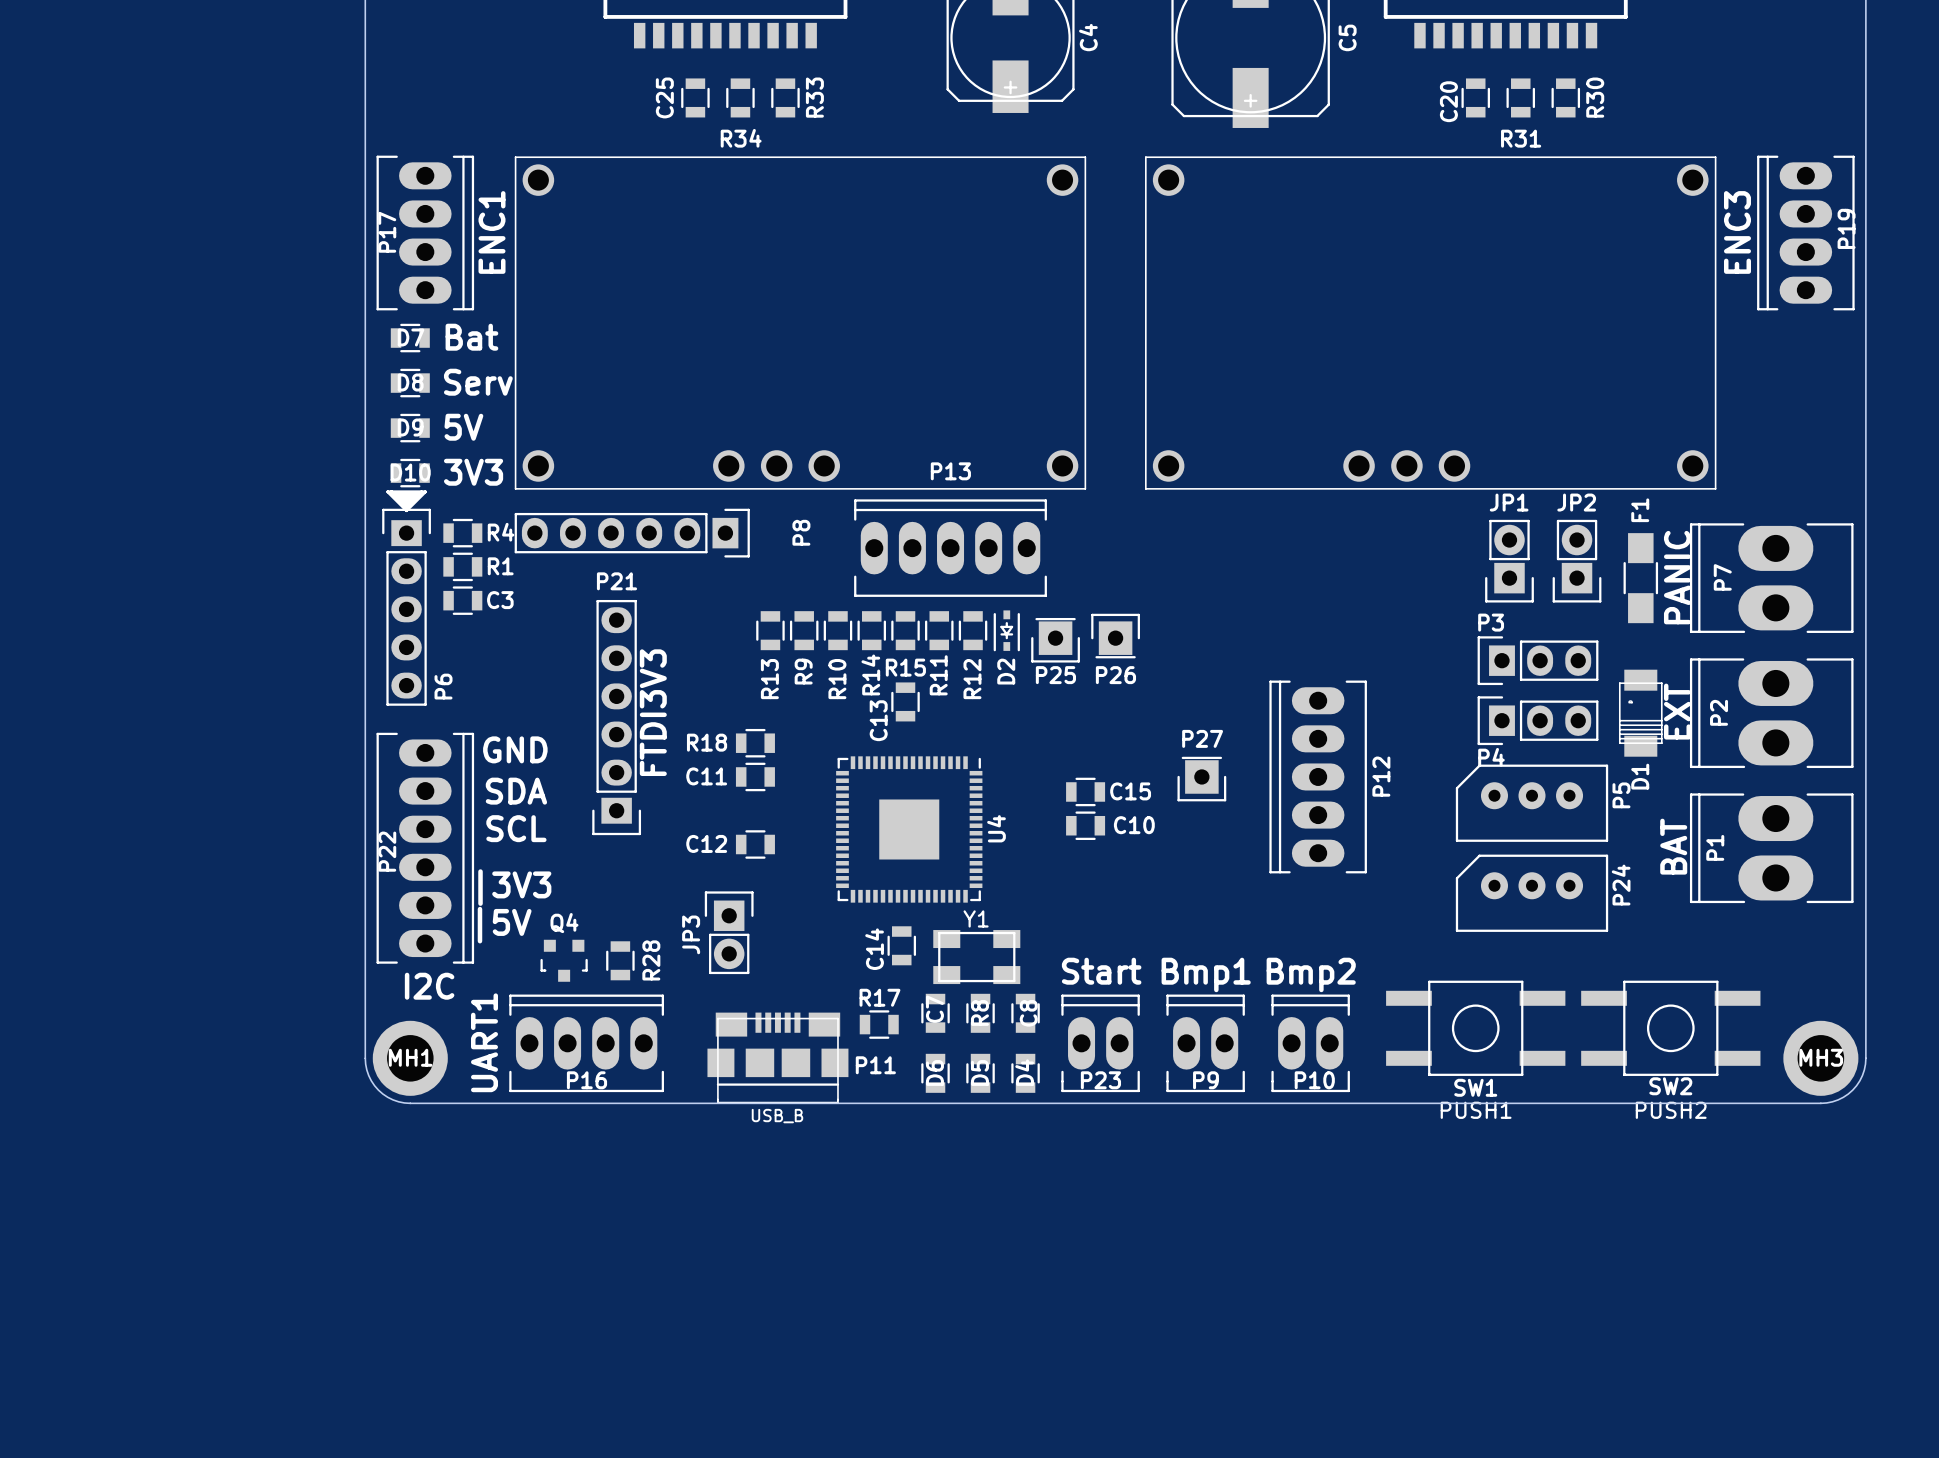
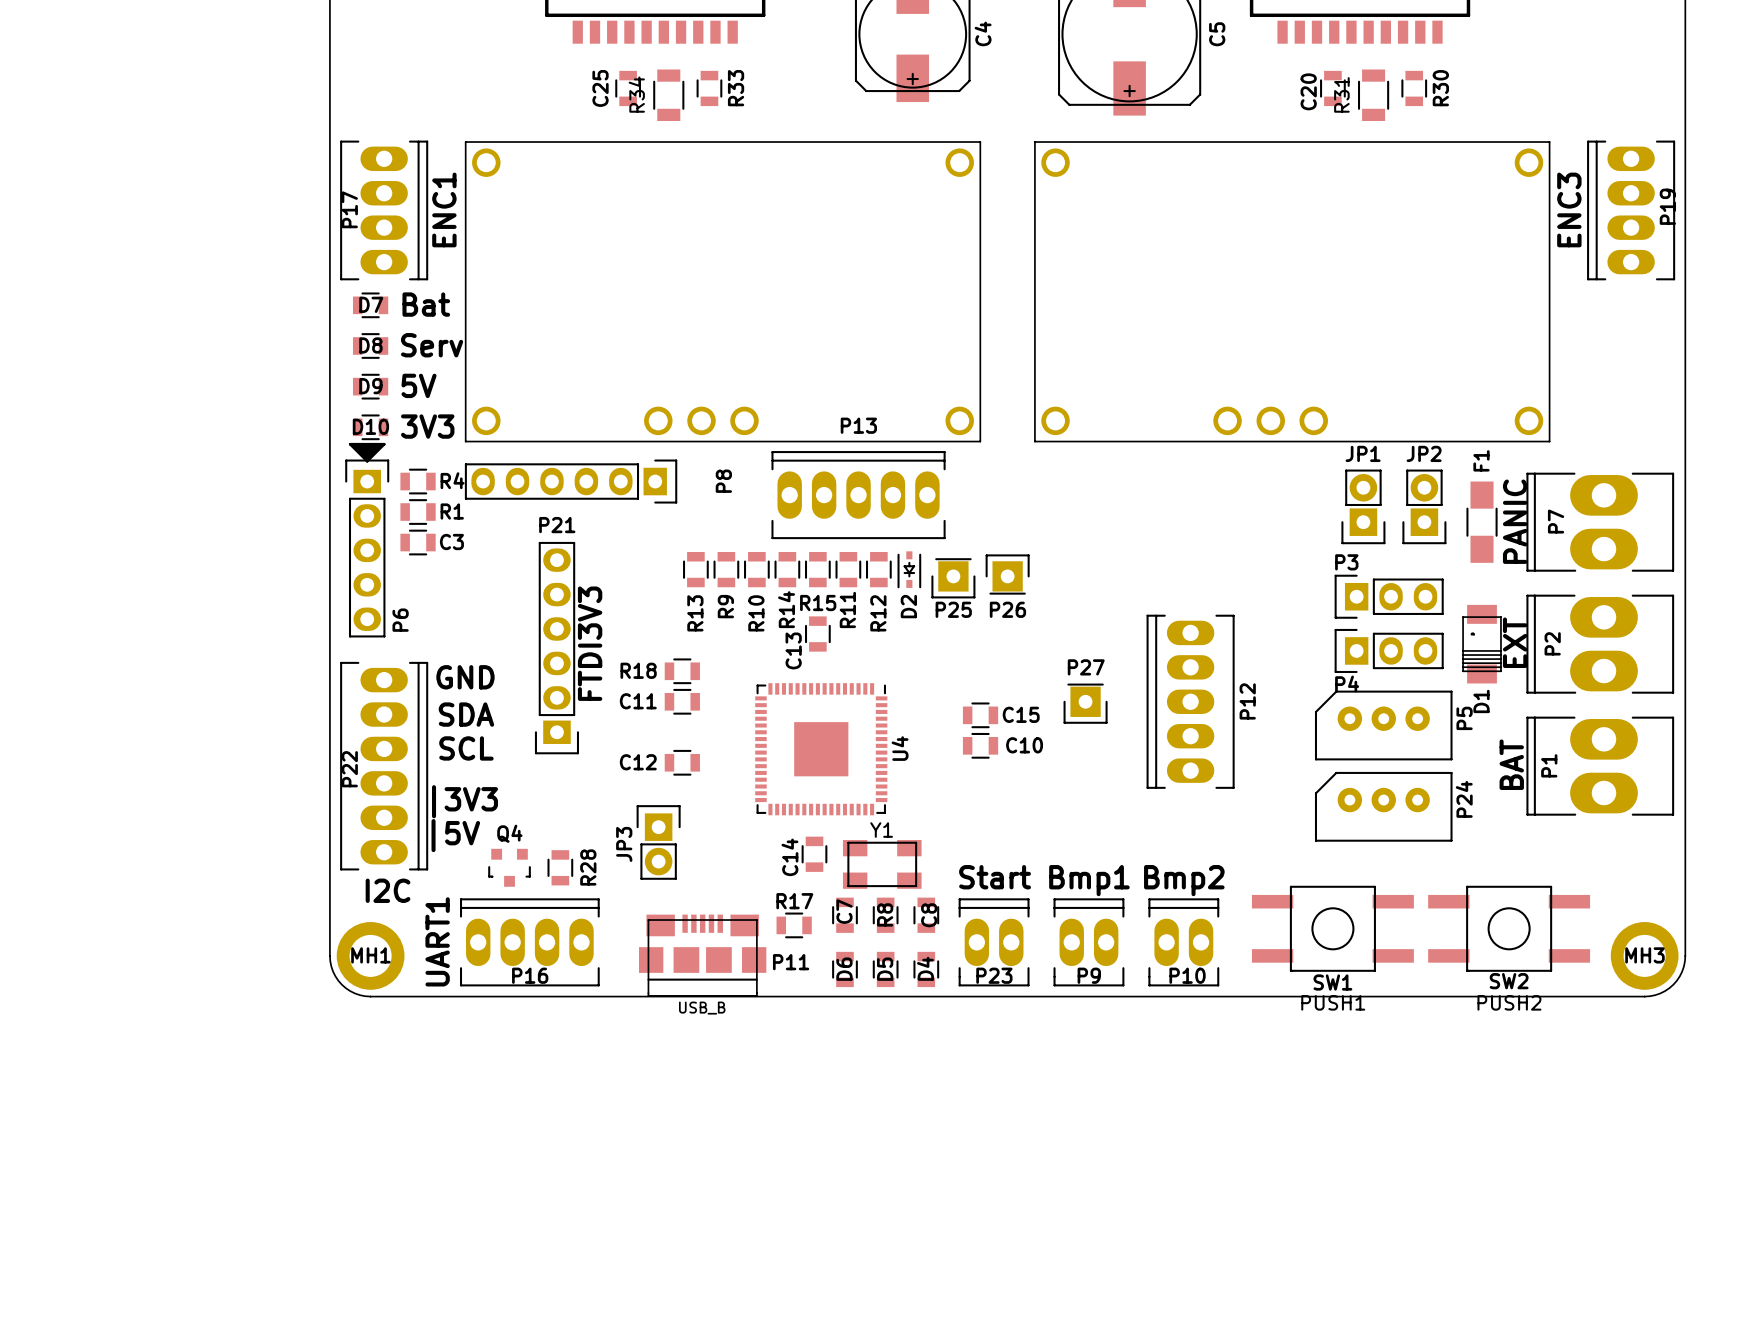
R34 footprint: [726, 78, 755, 118] -> [653, 69, 685, 122]
R31 footprint: [1506, 78, 1536, 118] -> [1358, 69, 1390, 122]
R34 name position: R34 (741, 138) -> R34 (636, 94)
R31 name position: R31 (1521, 138) -> R31 (1341, 94)

